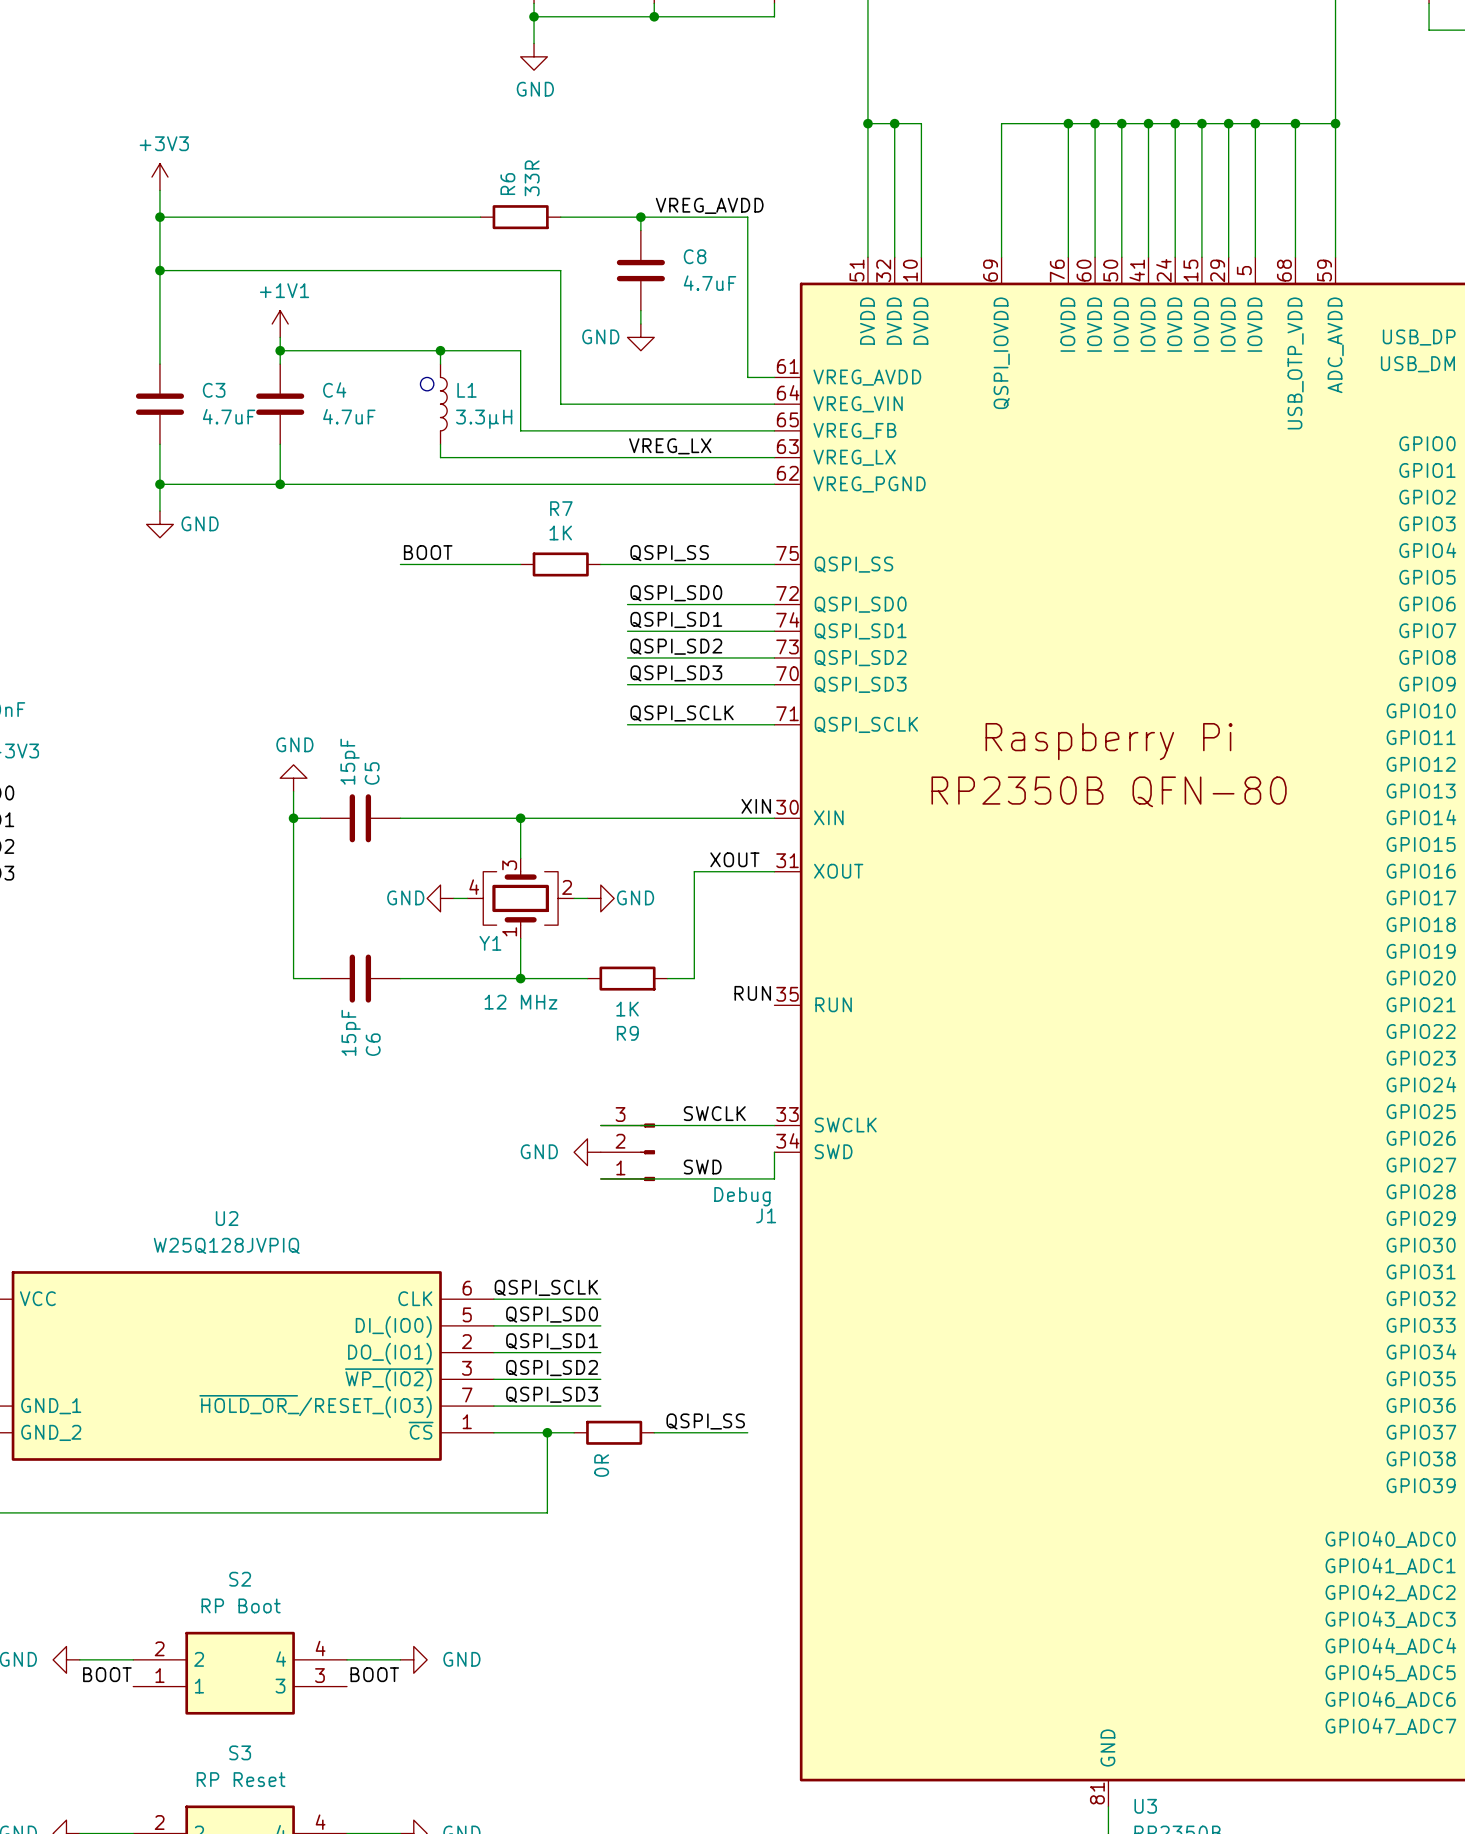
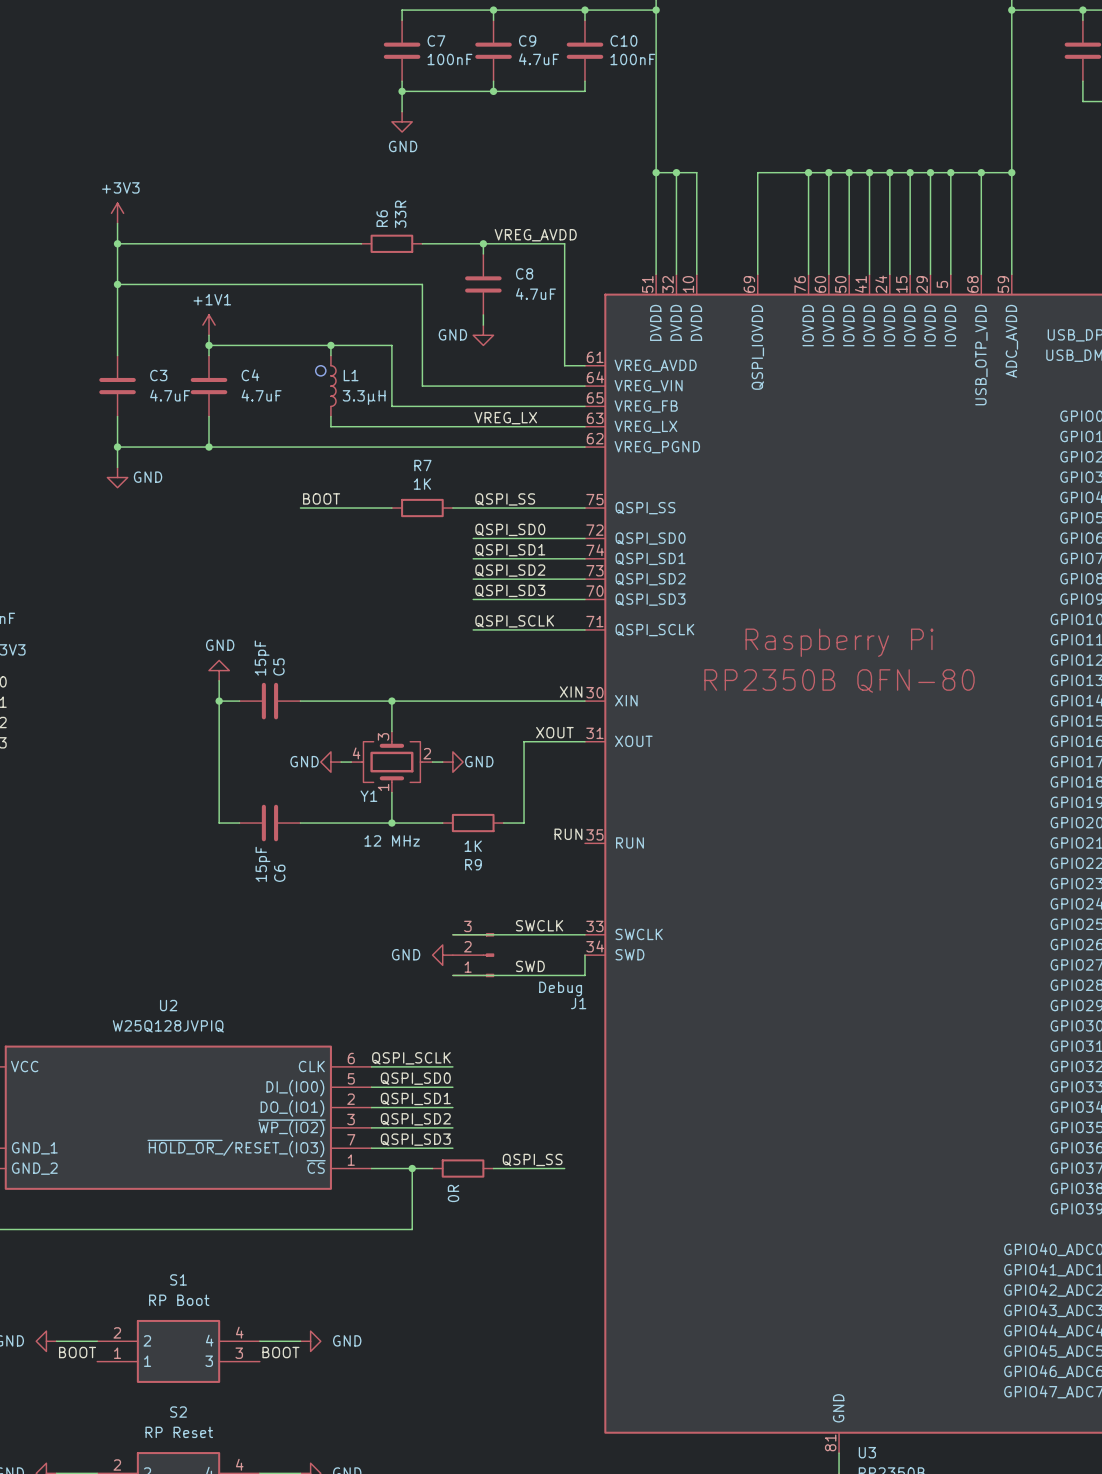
S2 name: S2 (240, 1579) -> S1 (178, 1279)
S3 name: S3 (240, 1752) -> S2 (178, 1412)

